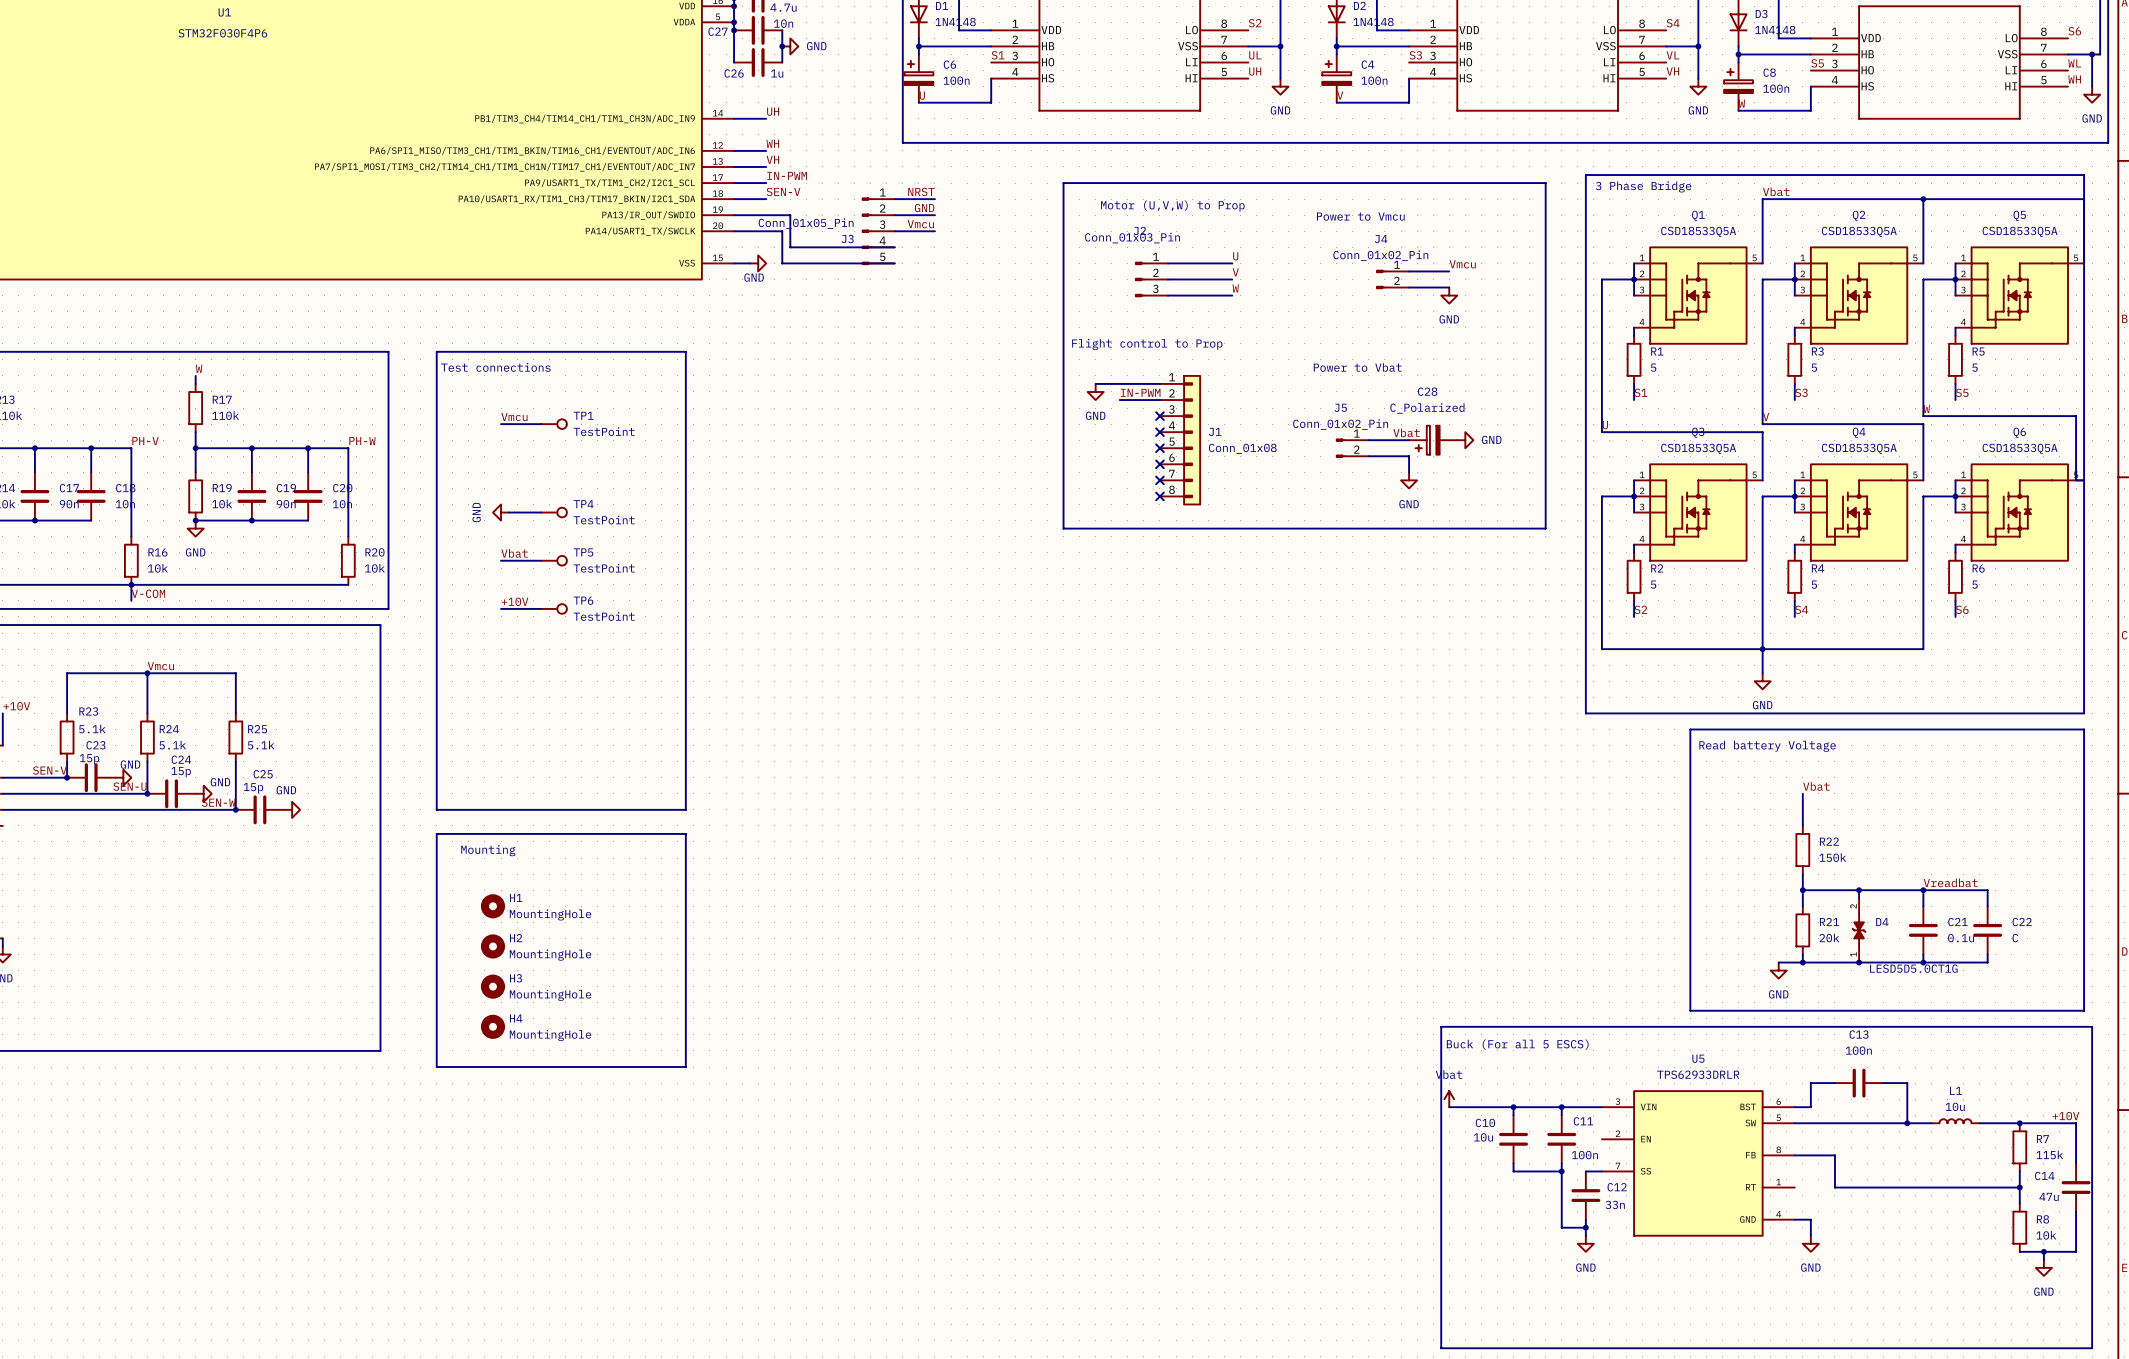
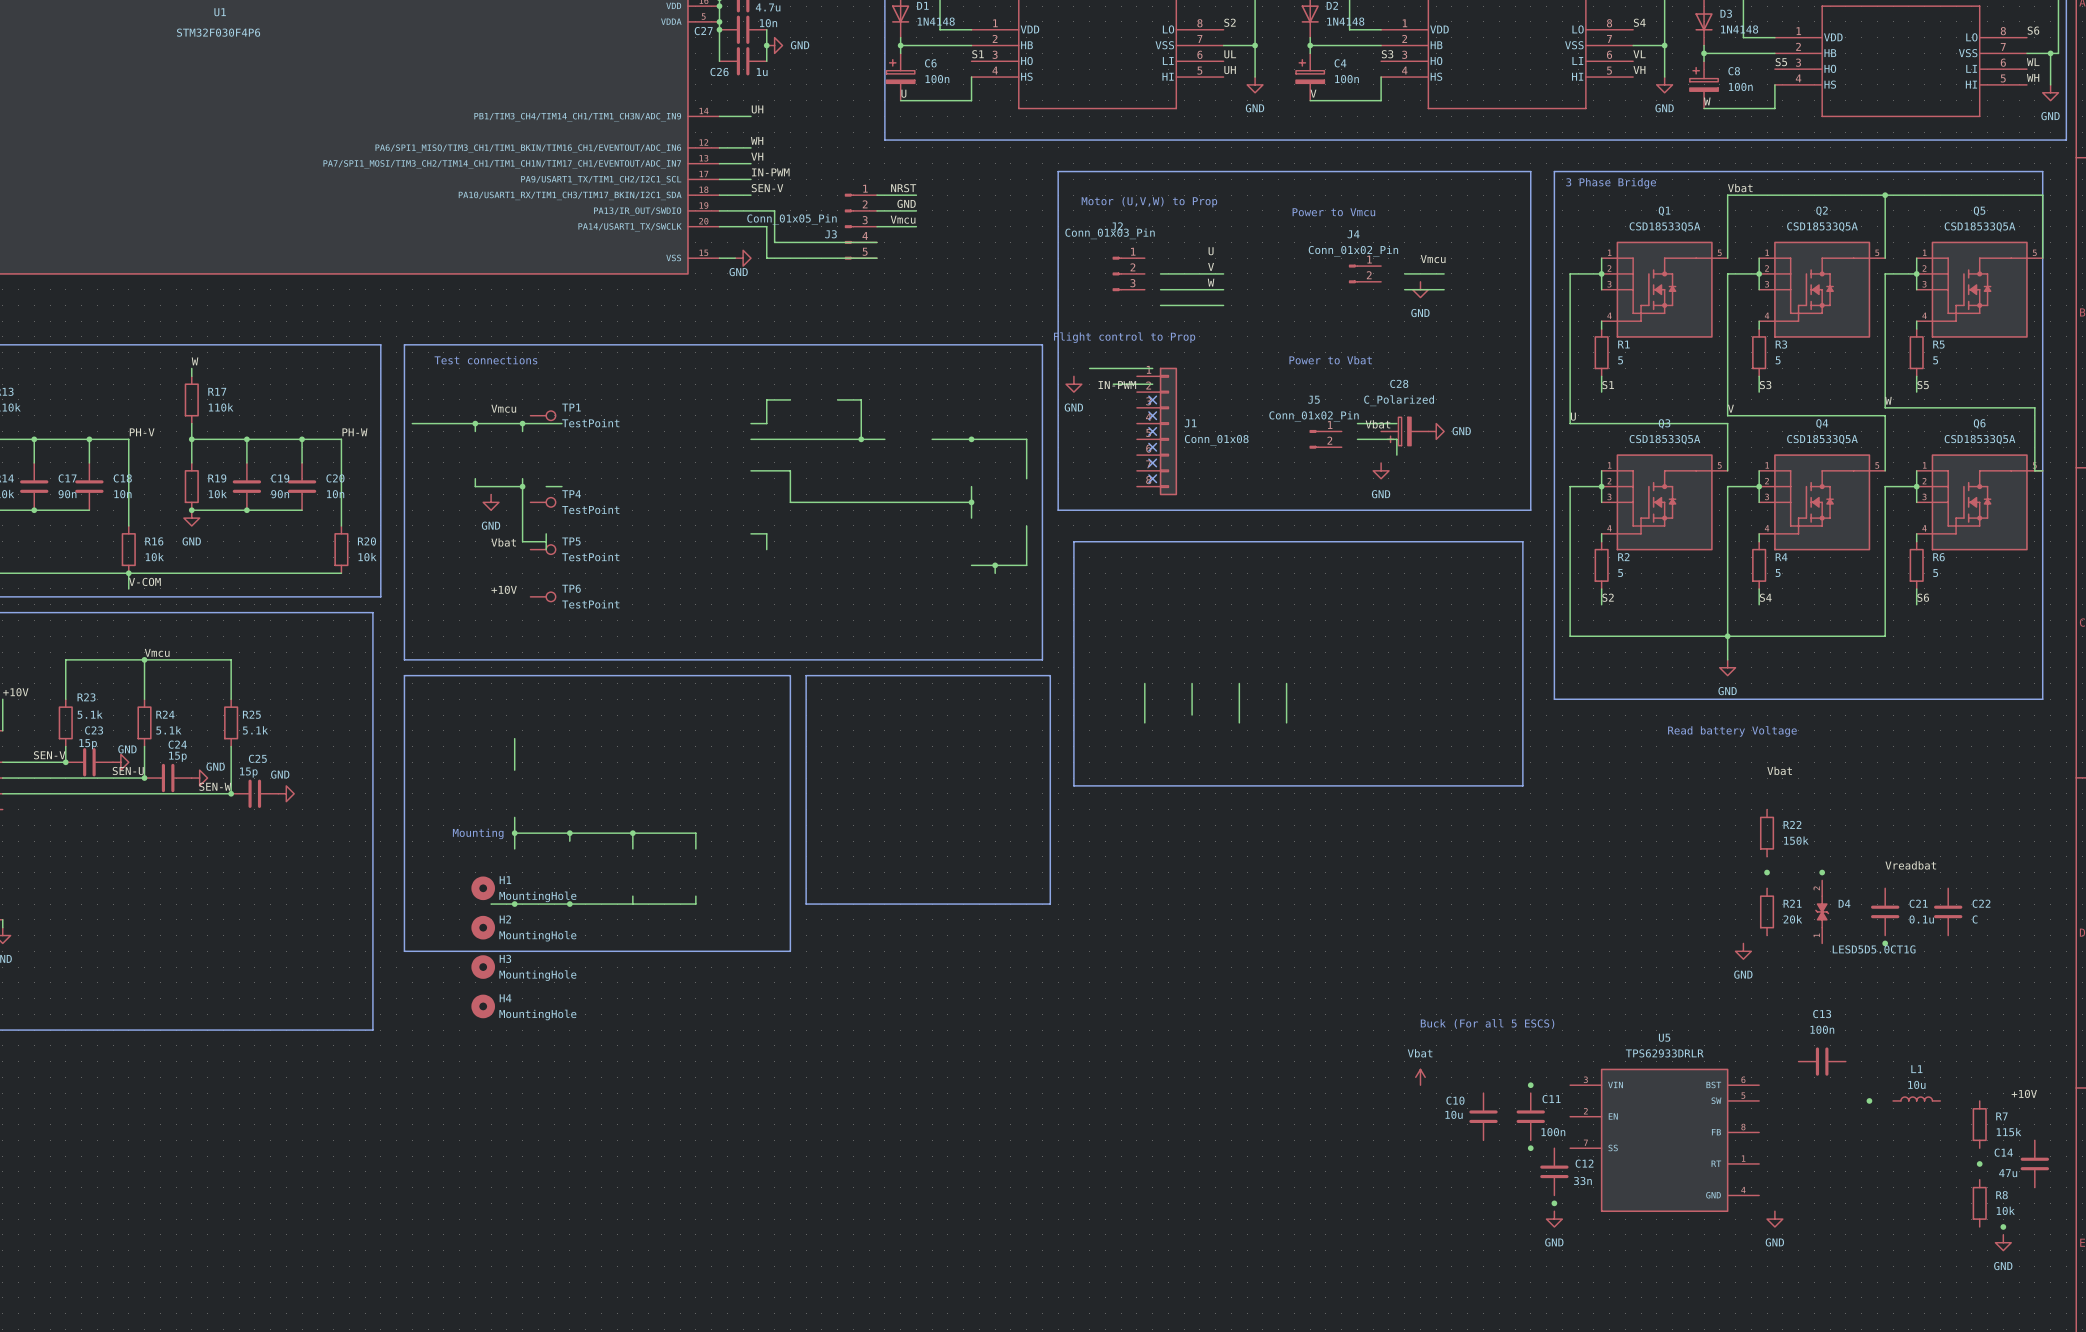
line: none -> (1058, 171) (1530, 171) (1530, 510) (1058, 510) (1058, 171)
wire: (1167, 263) (1232, 263) -> (1160, 305) (1223, 305)
wire: (1409, 271) (1449, 271) -> (1404, 273) (1444, 273)
wire: (1167, 279) (1184, 279) -> (1207, 273) (1223, 273)
wire: (1409, 287) (1449, 287) -> (1404, 289) (1444, 289)
wire: (1167, 295) (1184, 295) -> (1207, 289) (1223, 289)
line: (436, 351) (436, 809) (685, 809) (685, 351) -> (428, 344) (404, 344) (404, 659) (1042, 659) (1042, 518)
line: (1063, 351) (1063, 183) (1545, 183) (1545, 528) (1063, 528) -> (1042, 344) (672, 344)
wire: (1095, 383) (1159, 383) -> (1089, 368) (1152, 368)
wire: (1119, 400) (1159, 400) -> (1113, 384) (1152, 384)
wire: none -> (790, 399) (766, 399) (766, 423) (750, 423)
wire: none -> (837, 399) (861, 399) (861, 439)
no-connect mark: none -> (1152, 399)
no-connect mark: (1159, 416) -> none
wire: (501, 424) (541, 424) -> none
no-connect mark: none -> (1152, 415)
wire: none -> (412, 423) (561, 423)
wire: none -> (475, 423) (475, 431)
junction: none -> (475, 423)
wire: none -> (522, 423) (522, 431)
junction: none -> (522, 423)
no-connect mark: (1159, 432) -> none
no-connect mark: none -> (1152, 431)
wire: (1368, 440) (1409, 440) -> (1357, 423) (1396, 423)
wire: none -> (750, 439) (884, 439)
junction: none -> (861, 439)
wire: none -> (932, 439) (1026, 439) (1026, 478)
junction: none -> (971, 439)
no-connect mark: (1159, 448) -> none
no-connect mark: none -> (1152, 447)
wire: (1368, 456) (1409, 456) (1409, 472) -> (1357, 439) (1396, 439) (1396, 455)
no-connect mark: (1159, 464) -> none
no-connect mark: none -> (1152, 462)
wire: none -> (750, 470) (790, 470) (790, 502) (971, 502)
no-connect mark: (1159, 480) -> none
wire: none -> (475, 478) (475, 486) (522, 486)
wire: none -> (522, 478) (522, 541) (546, 541)
no-connect mark: none -> (1152, 478)
junction: none -> (522, 486)
wire: none -> (546, 486) (561, 486)
wire: none -> (971, 486) (971, 518)
no-connect mark: (1159, 496) -> none
power symbol rotation: 0° (501, 512) -> 90° counterclockwise (491, 502)
wire: (509, 512) (541, 512) -> none
junction: none -> (971, 502)
wire: none -> (1026, 525) (1026, 565) (971, 565)
wire: none -> (546, 533) (546, 549)
wire: none -> (750, 533) (766, 533) (766, 549)
line: none -> (1073, 541) (1522, 541) (1522, 785) (1073, 785) (1073, 541)
wire: (501, 560) (541, 560) -> none
wire: none -> (995, 565) (995, 573)
junction: none -> (995, 565)
wire: (501, 608) (541, 608) -> none
line: none -> (404, 675) (790, 675) (790, 951) (404, 951) (404, 675)
line: none -> (806, 675) (1050, 675) (1050, 904) (806, 904) (806, 675)
wire: none -> (1144, 683) (1144, 722)
wire: none -> (1192, 683) (1192, 715)
wire: none -> (1239, 683) (1239, 722)
wire: none -> (1286, 683) (1286, 722)
line: (1690, 729) (2084, 729) (2084, 1010) (1690, 1010) (1690, 729) -> none
wire: none -> (514, 738) (514, 770)
wire: (1802, 793) (1802, 825) -> none
line: (436, 833) (685, 833) (685, 1067) (436, 1067) (436, 833) -> none
wire: none -> (514, 817) (514, 848)
wire: none -> (514, 833) (695, 833) (695, 848)
junction: none -> (514, 833)
wire: none -> (569, 833) (569, 841)
junction: none -> (569, 833)
wire: none -> (632, 833) (632, 848)
junction: none -> (632, 833)
wire: (1802, 874) (1802, 906) -> none
wire: (1802, 890) (1987, 890) (1987, 906) -> none
wire: (1859, 890) (1859, 898) -> none
wire: (1923, 890) (1923, 906) -> none
junction: (1923, 890) -> none
wire: none -> (632, 896) (632, 904)
wire: none -> (695, 896) (695, 904) (491, 904)
junction: none -> (514, 904)
junction: none -> (569, 904)
wire: (1802, 954) (1802, 962) -> none
wire: (1923, 954) (1923, 962) -> none
wire: (1987, 954) (1987, 962) (1778, 962) -> none
junction: (1802, 962) -> none
junction: (1859, 962) -> none
line: (1441, 1026) (2092, 1026) (2092, 1348) (1441, 1348) (1441, 1026) -> none
wire: (1834, 1083) (1810, 1083) (1810, 1107) (1794, 1107) -> none
wire: (1883, 1083) (1907, 1083) (1907, 1123) -> none
wire: (1449, 1107) (1601, 1107) -> none
wire: (1513, 1107) (1513, 1115) -> none
junction: (1513, 1107) -> none
wire: (1561, 1107) (1561, 1115) -> none
wire: (1794, 1123) (1931, 1123) -> none
wire: (1979, 1123) (2076, 1123) (2076, 1163) -> none
junction: (2019, 1123) -> none
wire: (1794, 1155) (1834, 1155) (1834, 1187) (2019, 1187) -> none
wire: (1513, 1163) (1513, 1171) (1561, 1171) -> none
wire: (1561, 1163) (1561, 1227) (1585, 1227) -> none
wire: (1585, 1171) (1601, 1171) -> none
wire: (2019, 1171) (2019, 1203) -> none
wire: (2076, 1211) (2076, 1251) (2019, 1251) -> none
wire: (1585, 1219) (1585, 1235) -> none
wire: (1794, 1219) (1810, 1219) (1810, 1235) -> none
wire: (2043, 1251) (2043, 1259) -> none

